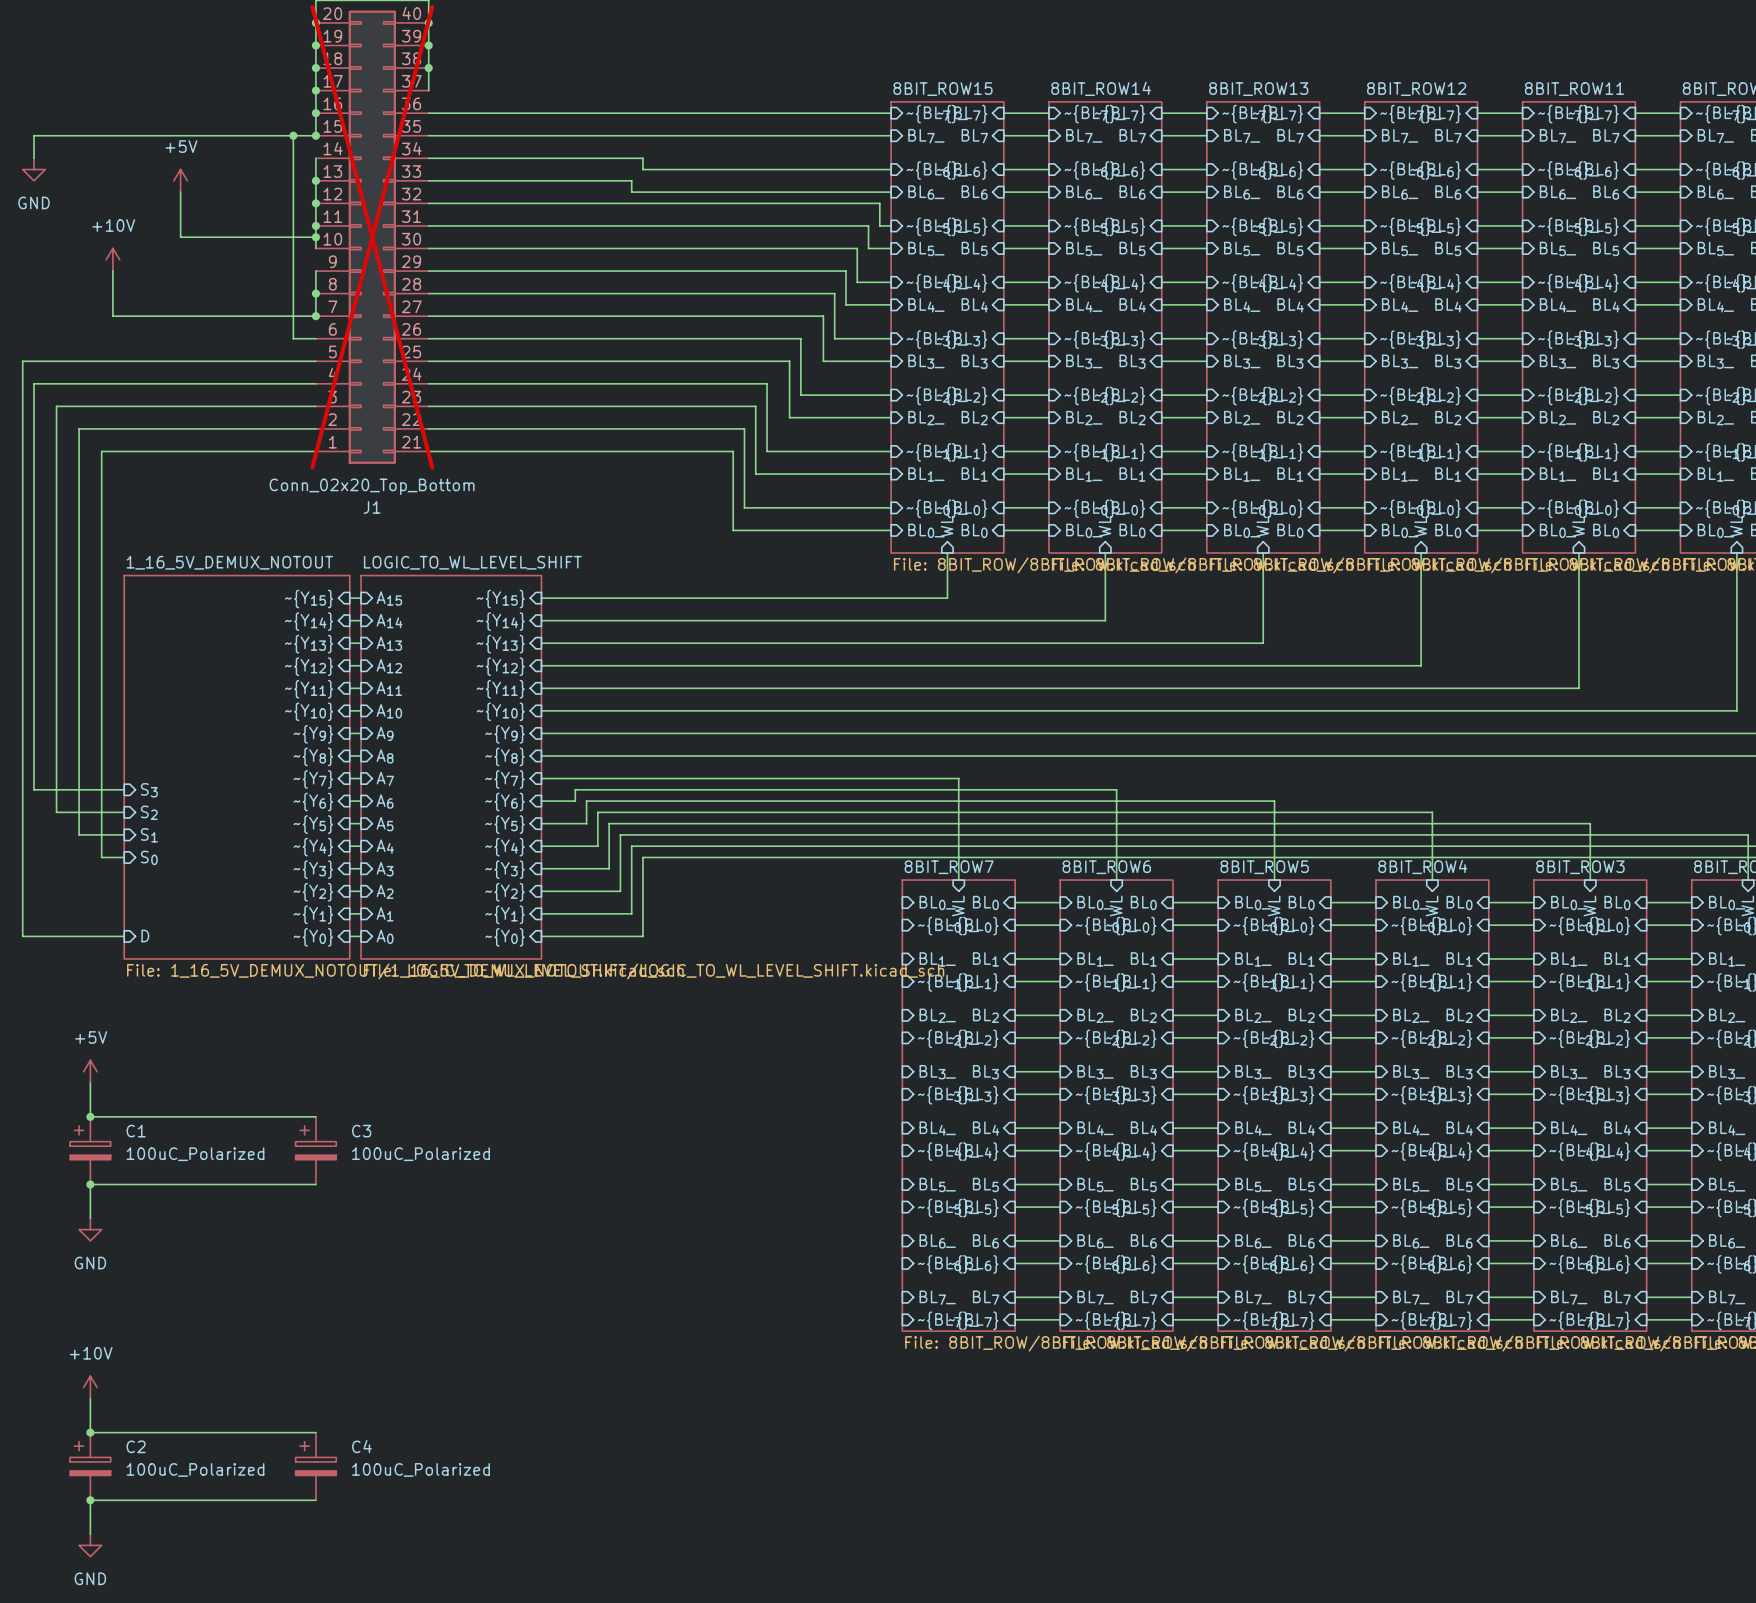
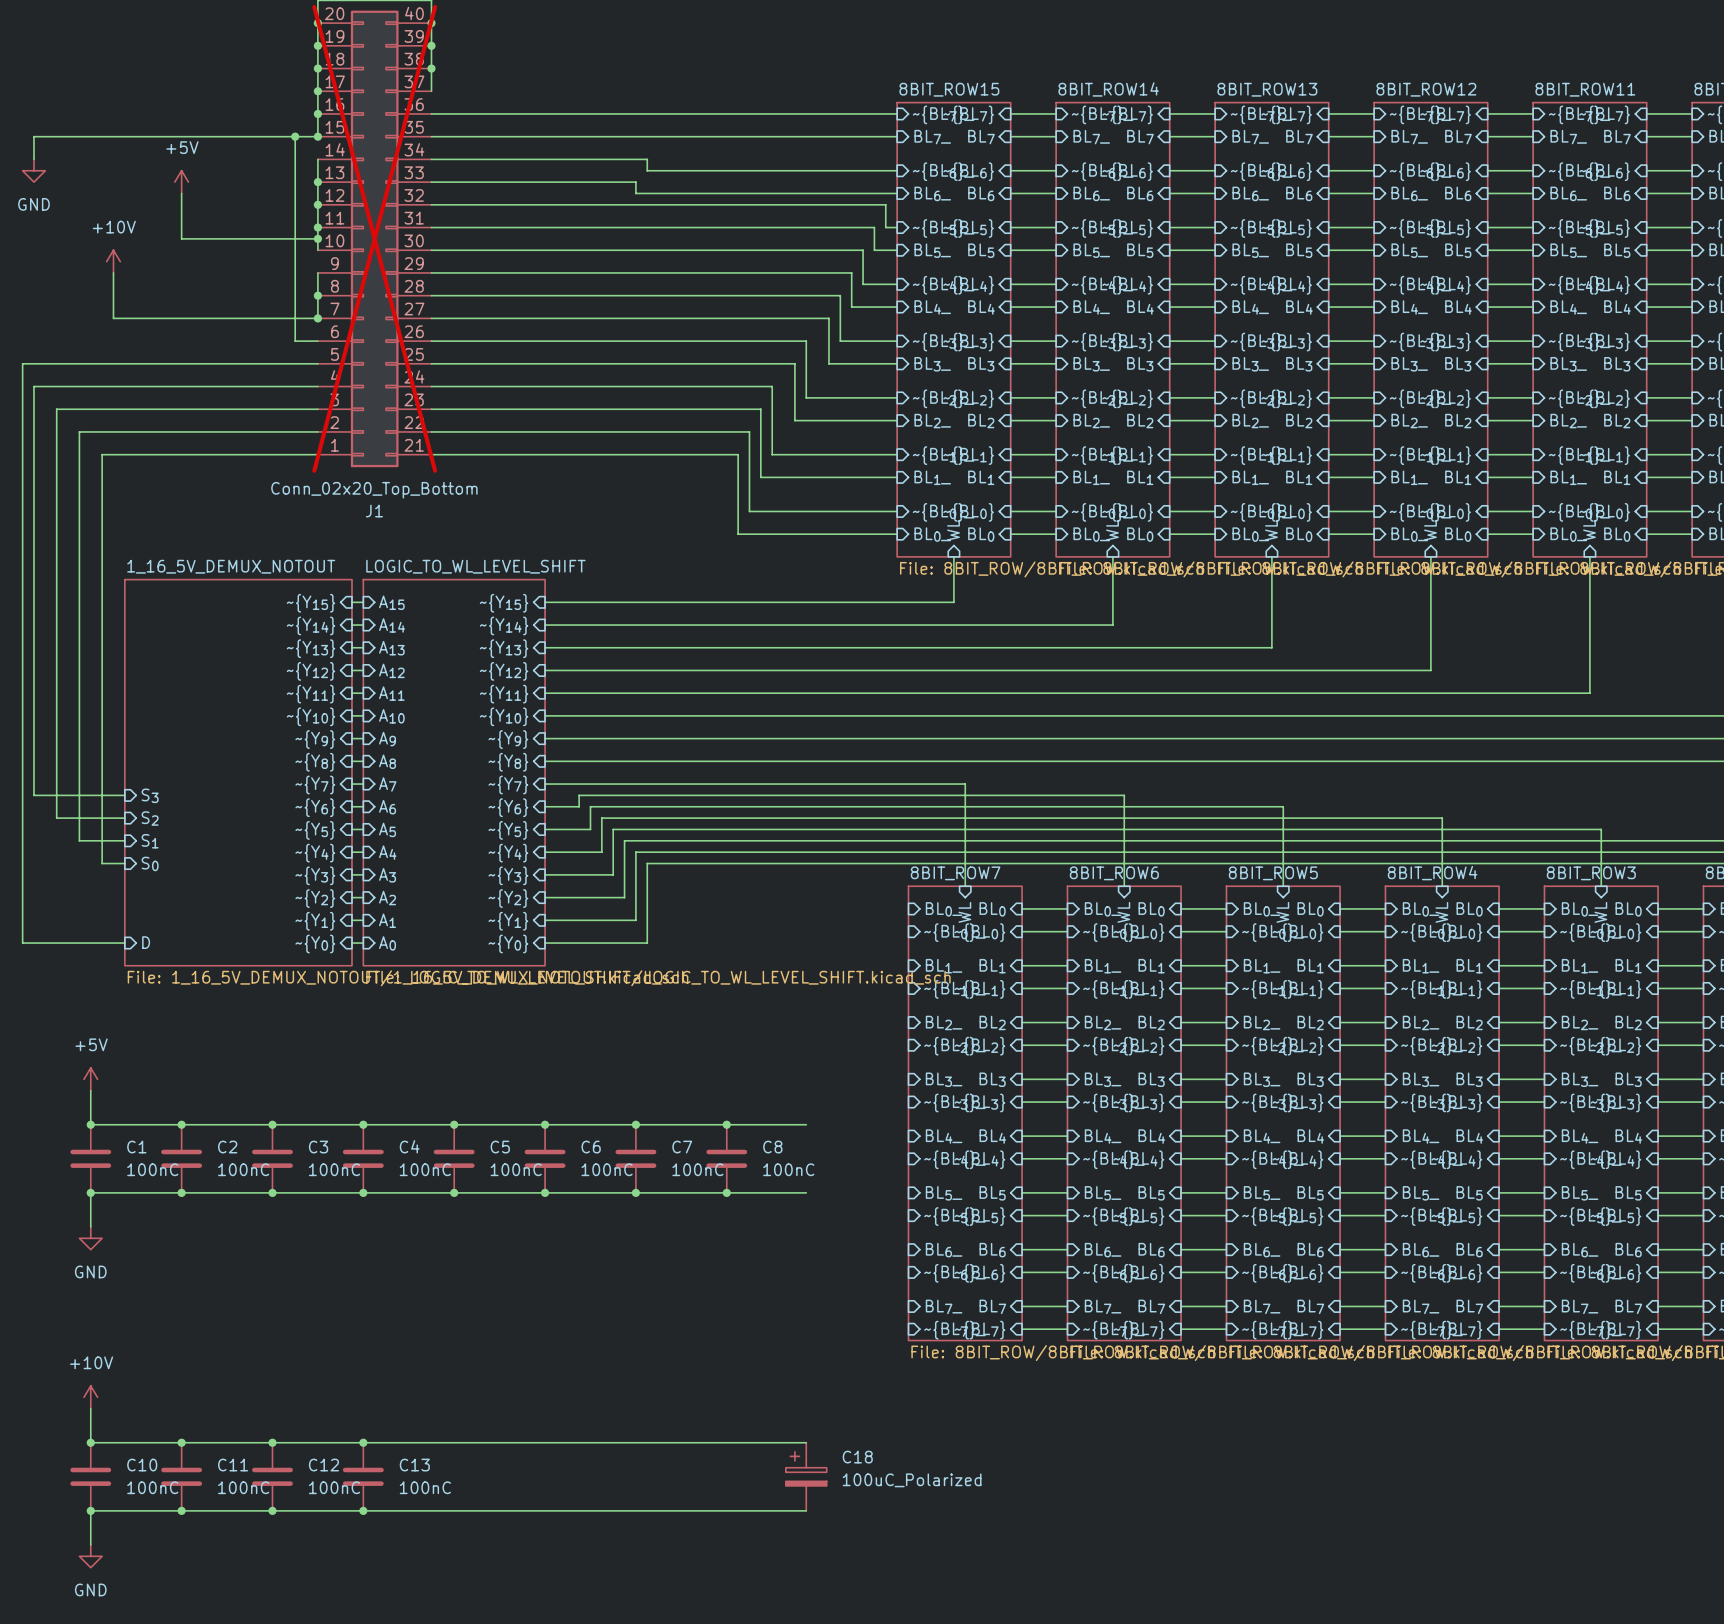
C1 symbol: [70, 1116, 111, 1185] -> [70, 1124, 112, 1193]
junction: none -> (181, 1124)
junction: none -> (272, 1124)
C3 symbol: [295, 1116, 337, 1185] -> [252, 1124, 293, 1193]
wire: none -> (317, 1124) (806, 1124)
junction: none -> (363, 1124)
junction: none -> (454, 1124)
junction: none -> (545, 1124)
junction: none -> (635, 1124)
junction: none -> (726, 1124)
C5: none -> 100nC (454, 1158)
C6: none -> 100nC (545, 1158)
C7: none -> 100nC (635, 1158)
C8: none -> 100nC (726, 1158)
C1 value: 100uC_Polarized (195, 1154) -> 100nC (152, 1169)
C3 value: 100uC_Polarized (421, 1154) -> 100nC (334, 1169)
junction: none -> (181, 1192)
junction: none -> (272, 1192)
wire: none -> (317, 1192) (806, 1192)
junction: none -> (363, 1192)
junction: none -> (454, 1192)
junction: none -> (545, 1192)
junction: none -> (635, 1192)
junction: none -> (726, 1192)
C2 symbol: [70, 1432, 111, 1501] -> [161, 1124, 203, 1193]
junction: none -> (181, 1442)
junction: none -> (272, 1442)
C4 symbol: [295, 1432, 337, 1501] -> [342, 1124, 384, 1193]
wire: none -> (317, 1442) (806, 1442)
junction: none -> (363, 1442)
C10: none -> 100nC (90, 1476)
C11: none -> 100nC (181, 1476)
C12: none -> 100nC (272, 1476)
C13: none -> 100nC (363, 1476)
C18: none -> 100uC_Polarized (806, 1476)
C2 value: 100uC_Polarized (195, 1469) -> 100nC (243, 1169)
C4 value: 100uC_Polarized (421, 1469) -> 100nC (425, 1169)
junction: none -> (181, 1510)
junction: none -> (272, 1510)
wire: none -> (317, 1510) (806, 1510)
junction: none -> (363, 1510)

